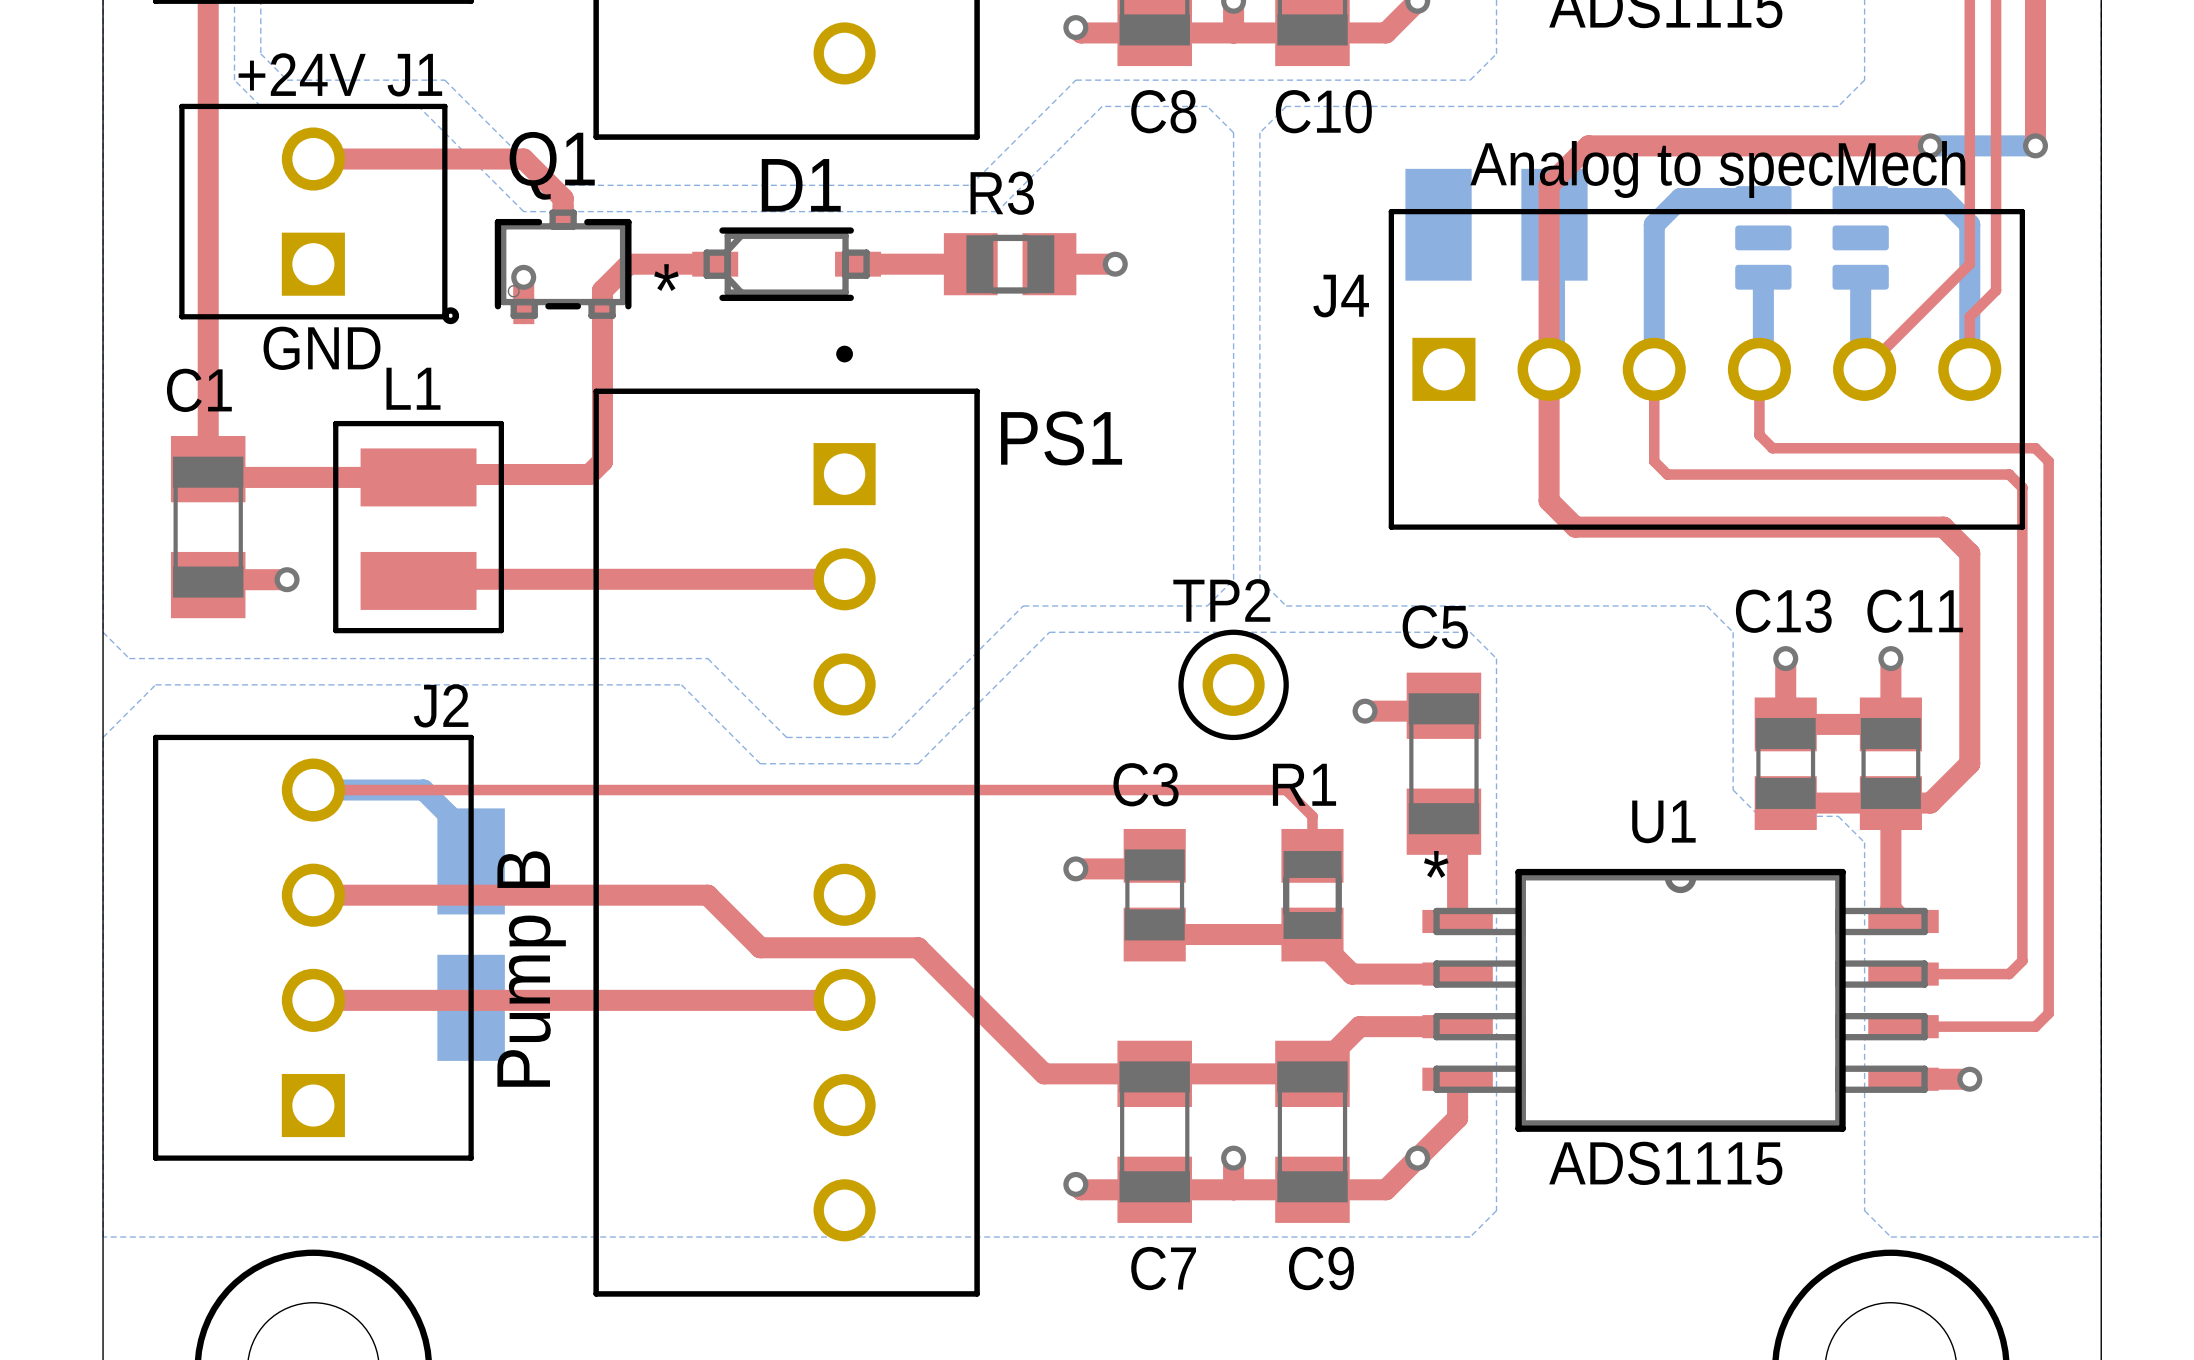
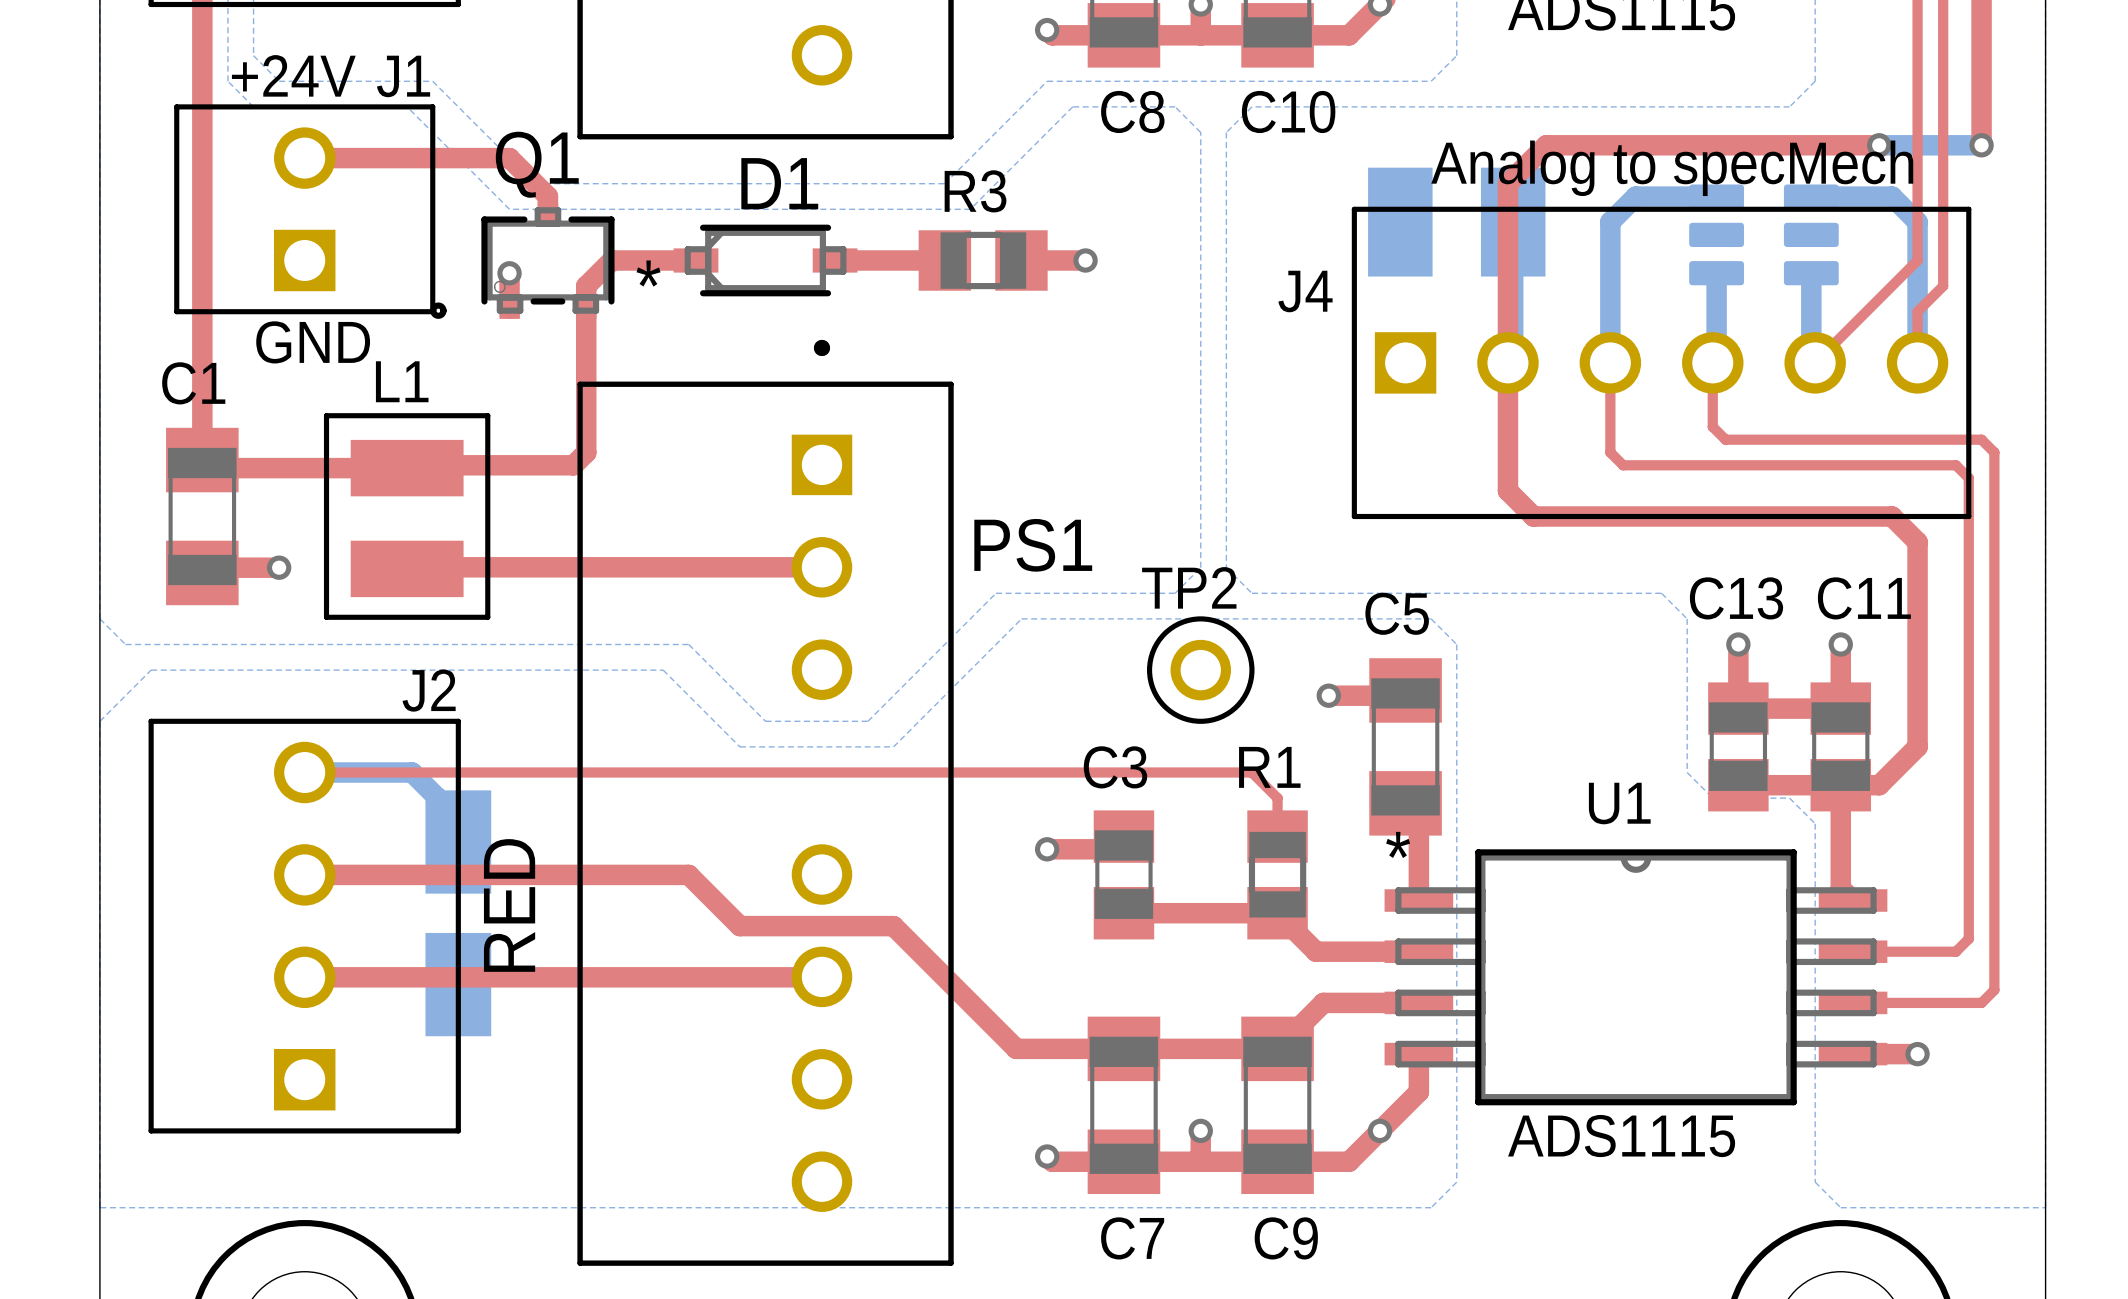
PS1 name position: PS1 (1061, 438) -> PS1 (1033, 545)
text: none -> RED (509, 905)
text: Pump B (531, 969) -> none

